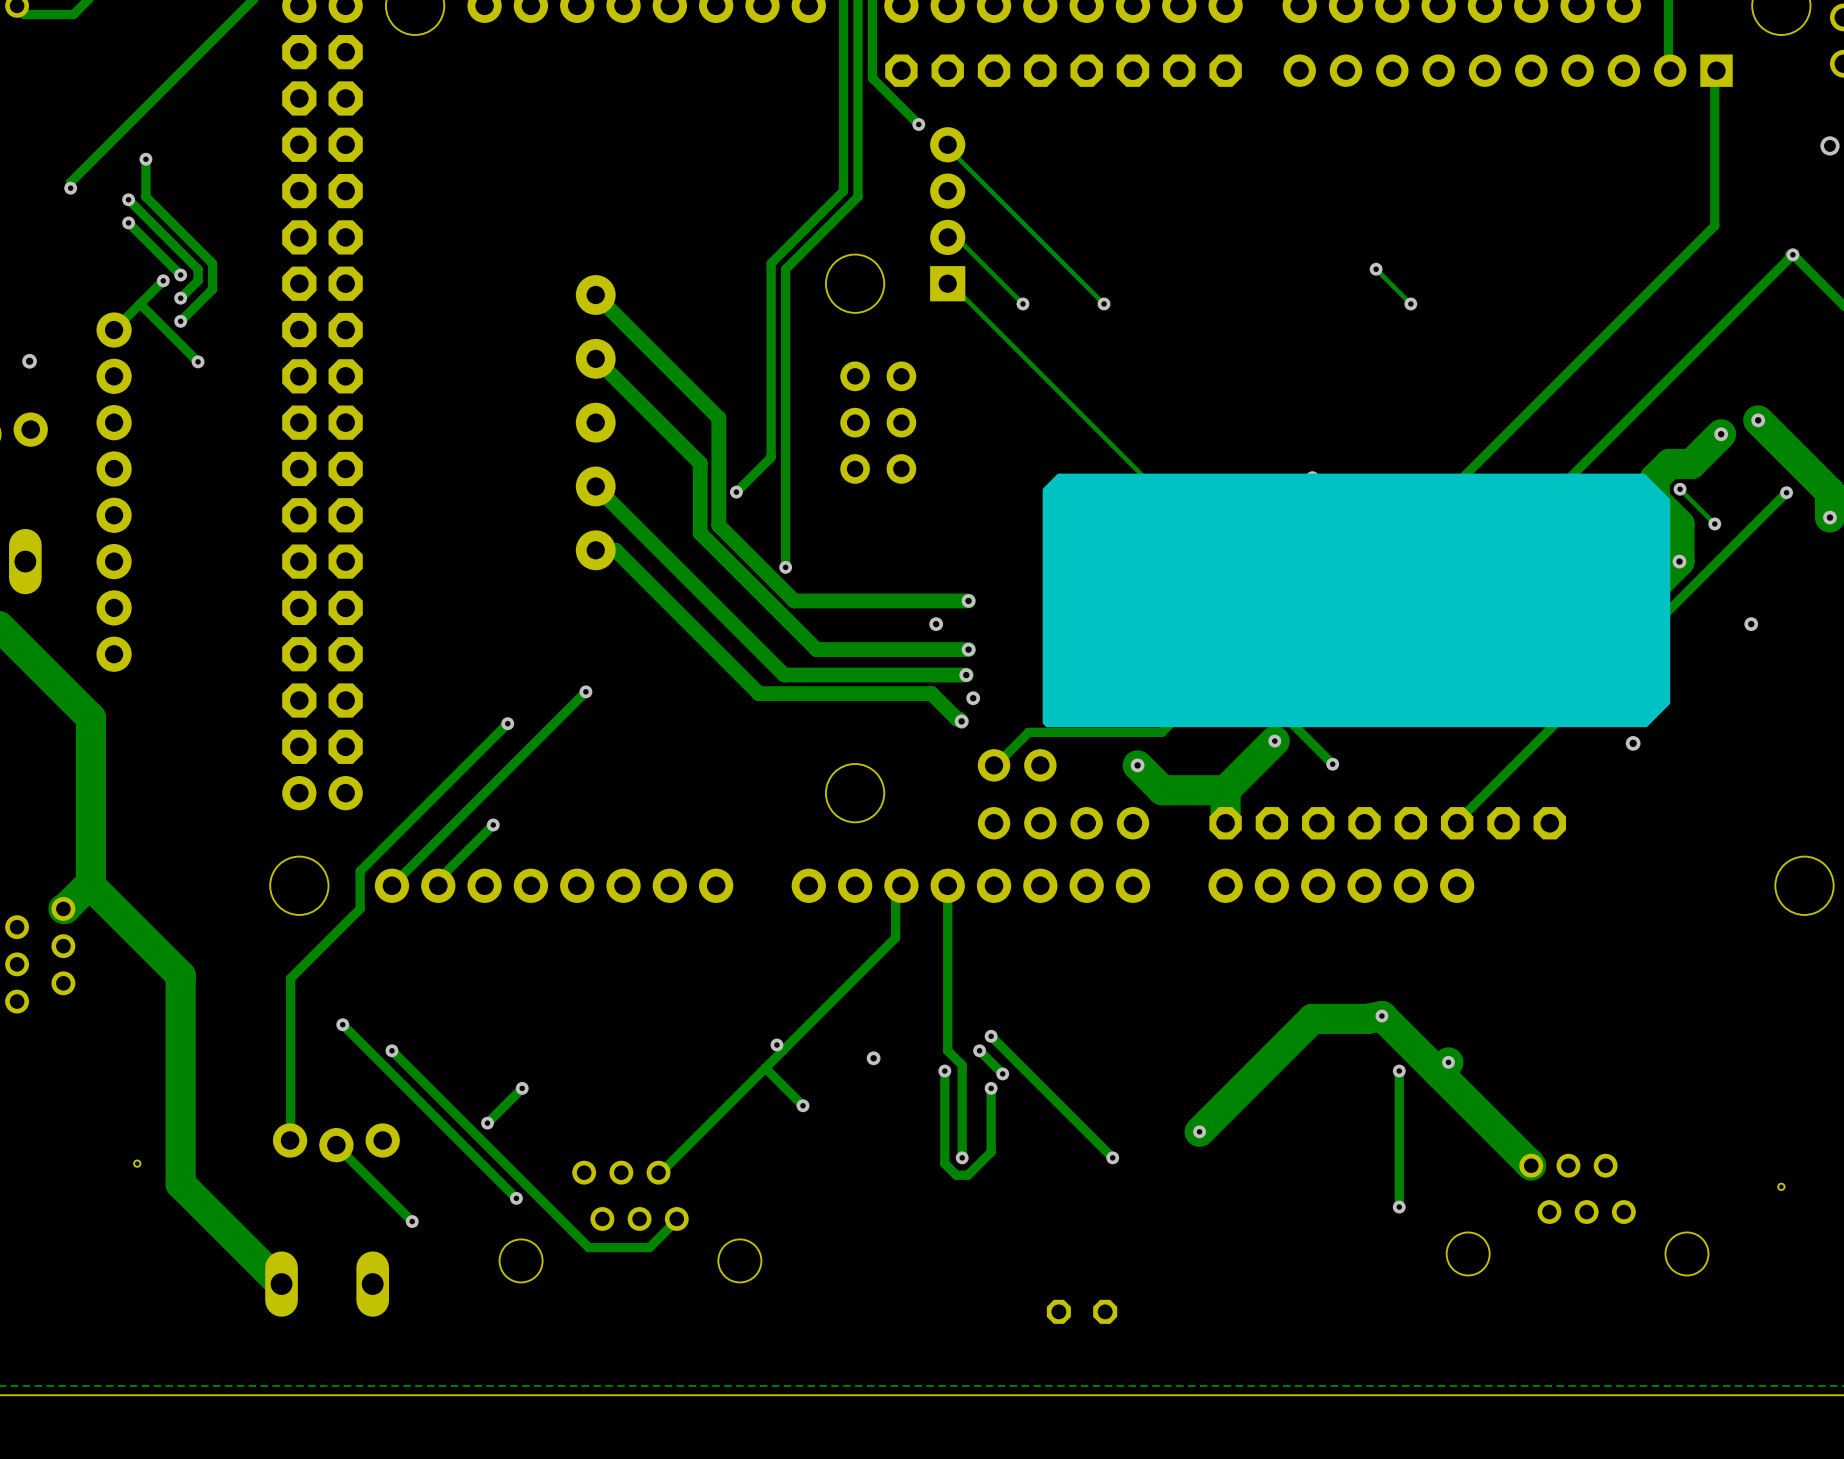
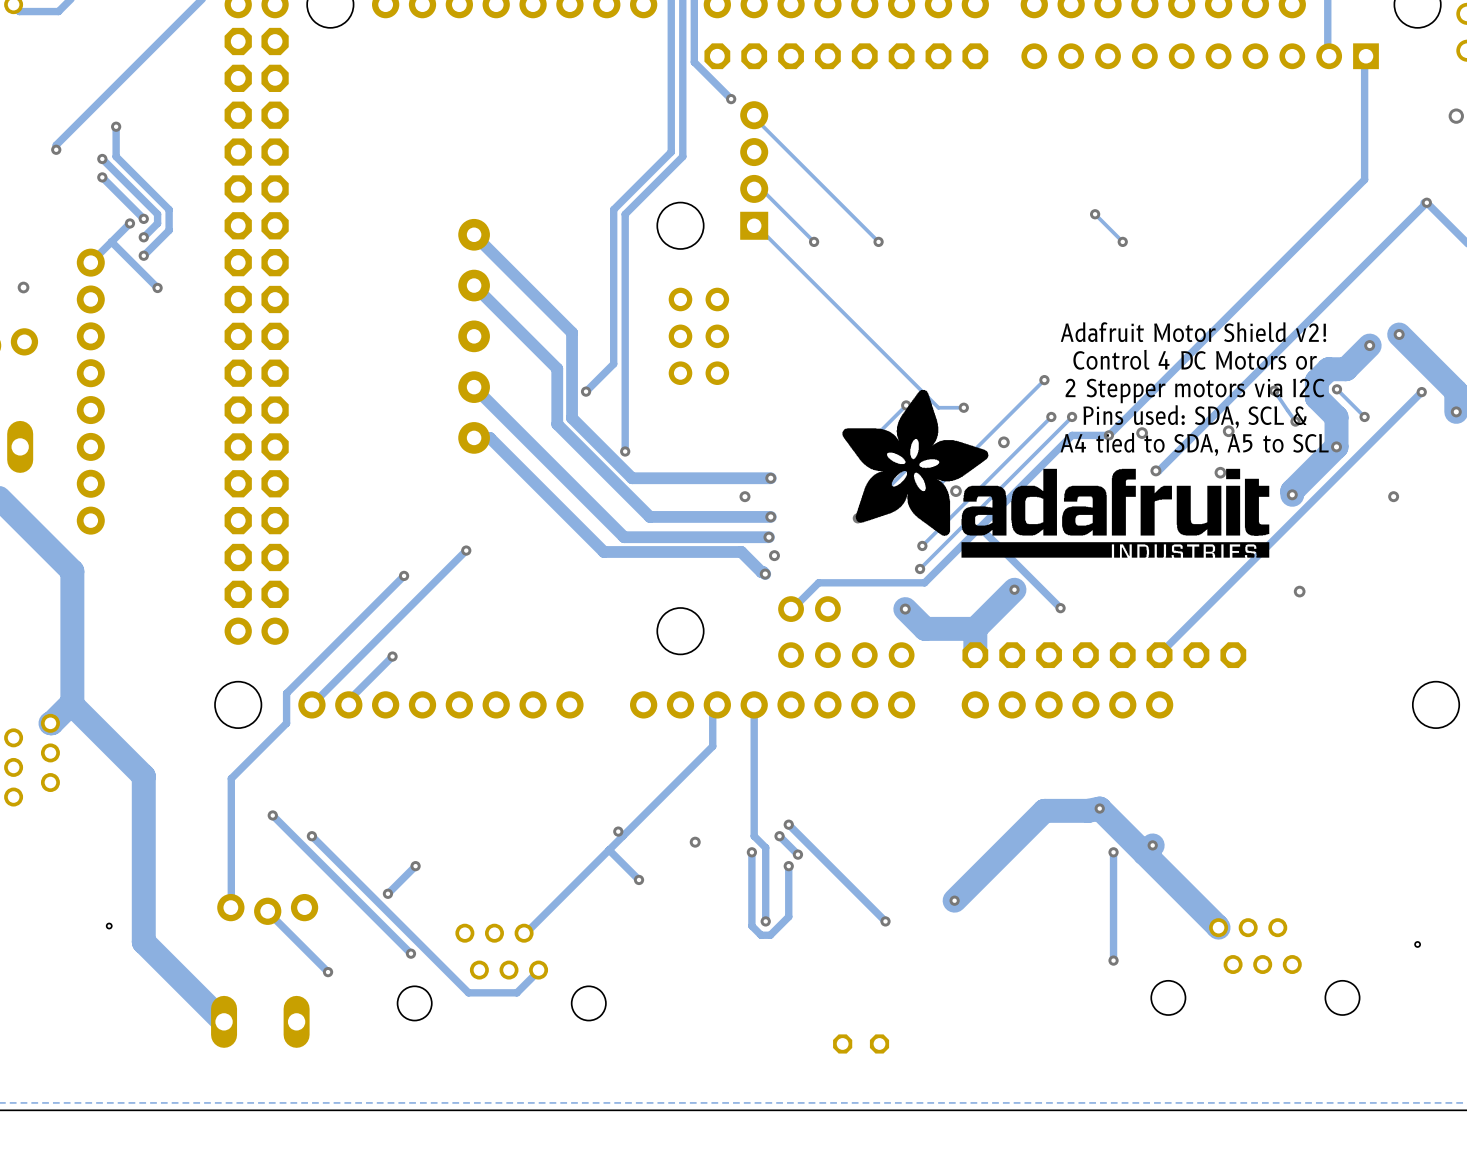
text: none -> Adafruit Motor Shield v2! (1193, 332)
text: none -> Control 4 DC Motors or (1195, 359)
drawing: [1042, 473, 1671, 728] -> none
text: none -> 2 Stepper motors via I2C (1195, 390)
text: none -> Pins used: SDA, SCL & (1194, 416)
text: none -> A4 tied to SDA, A5 to SCL (1194, 444)

